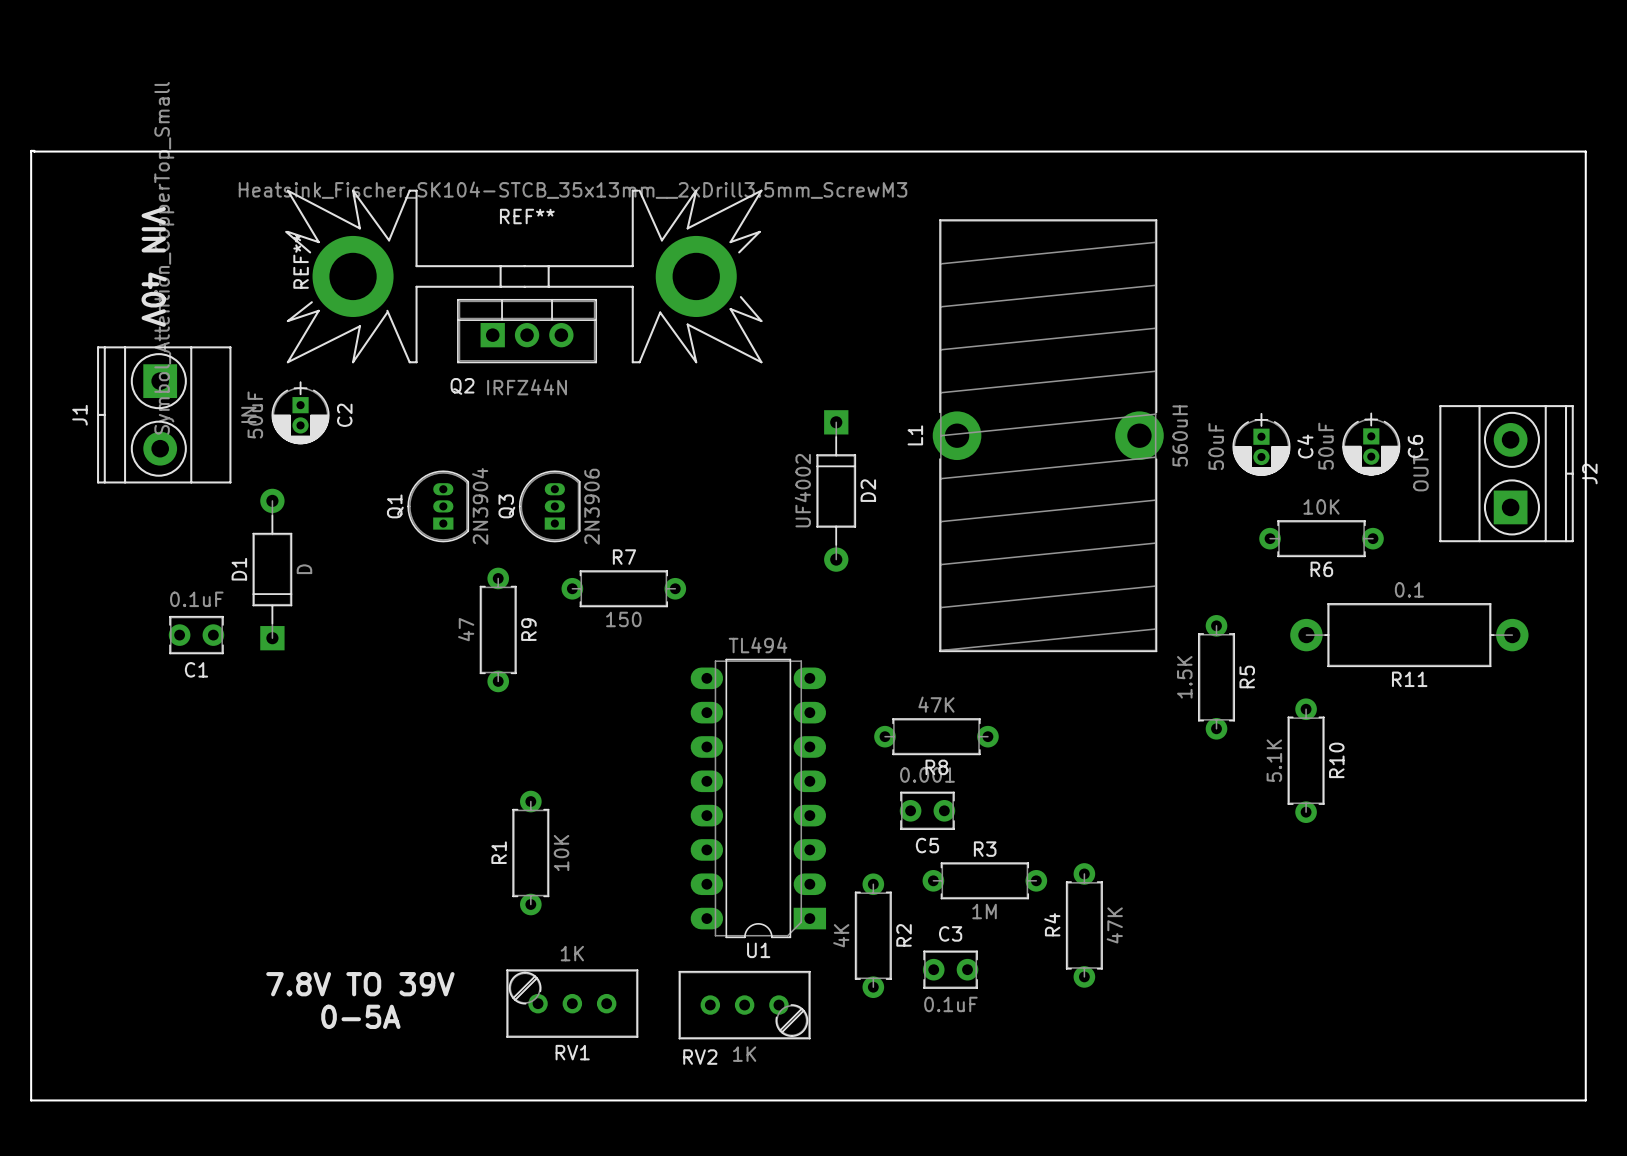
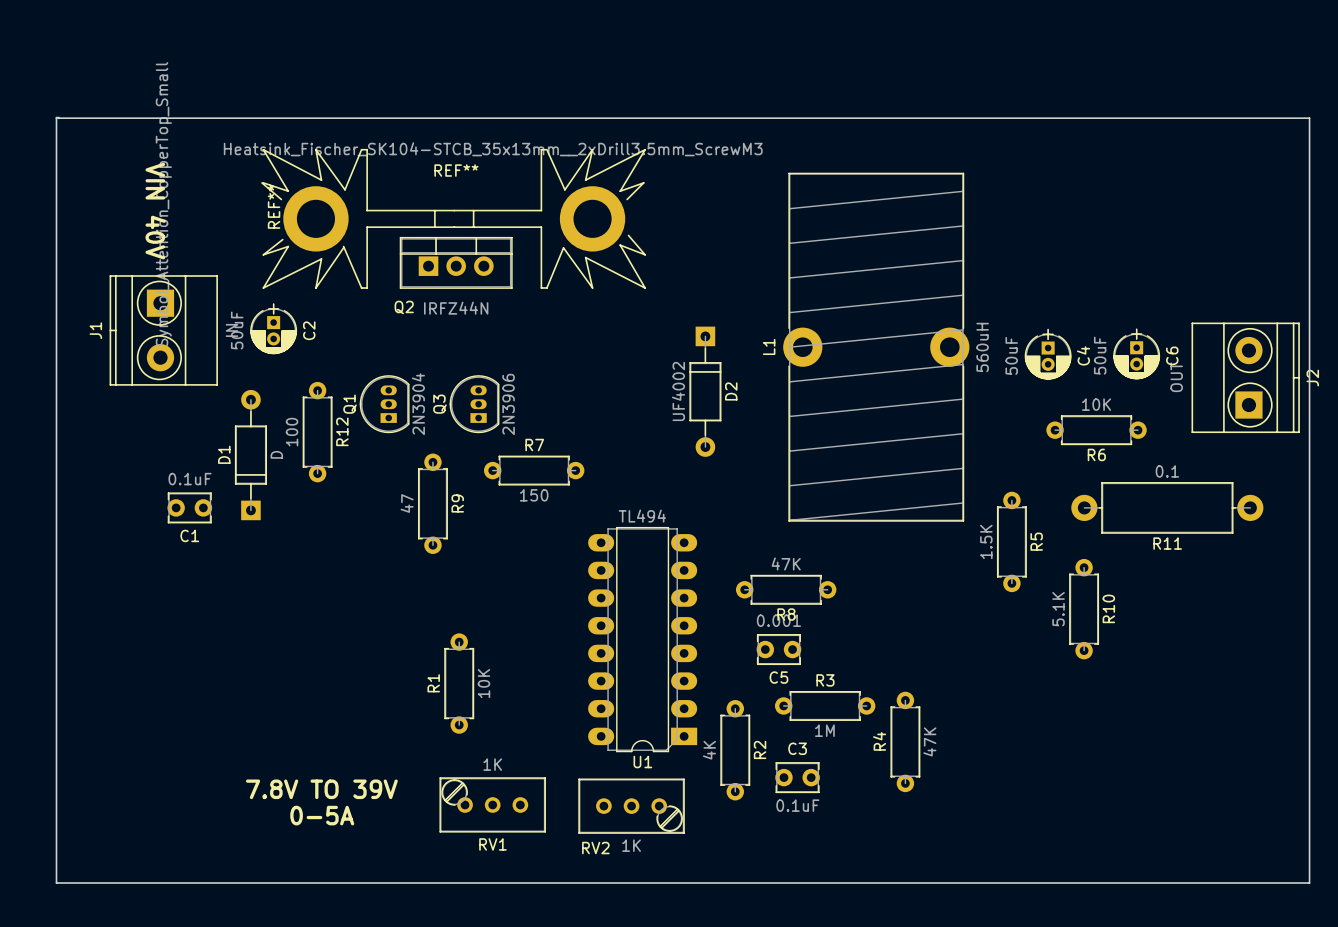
R12: none -> 100 (317, 432)

